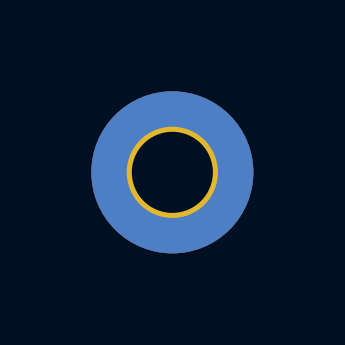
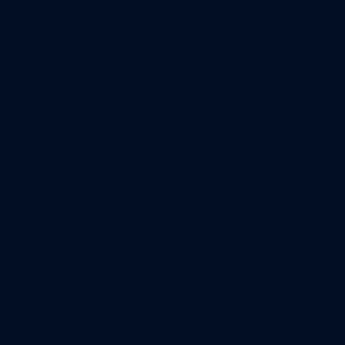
part: (172, 172) -> none

